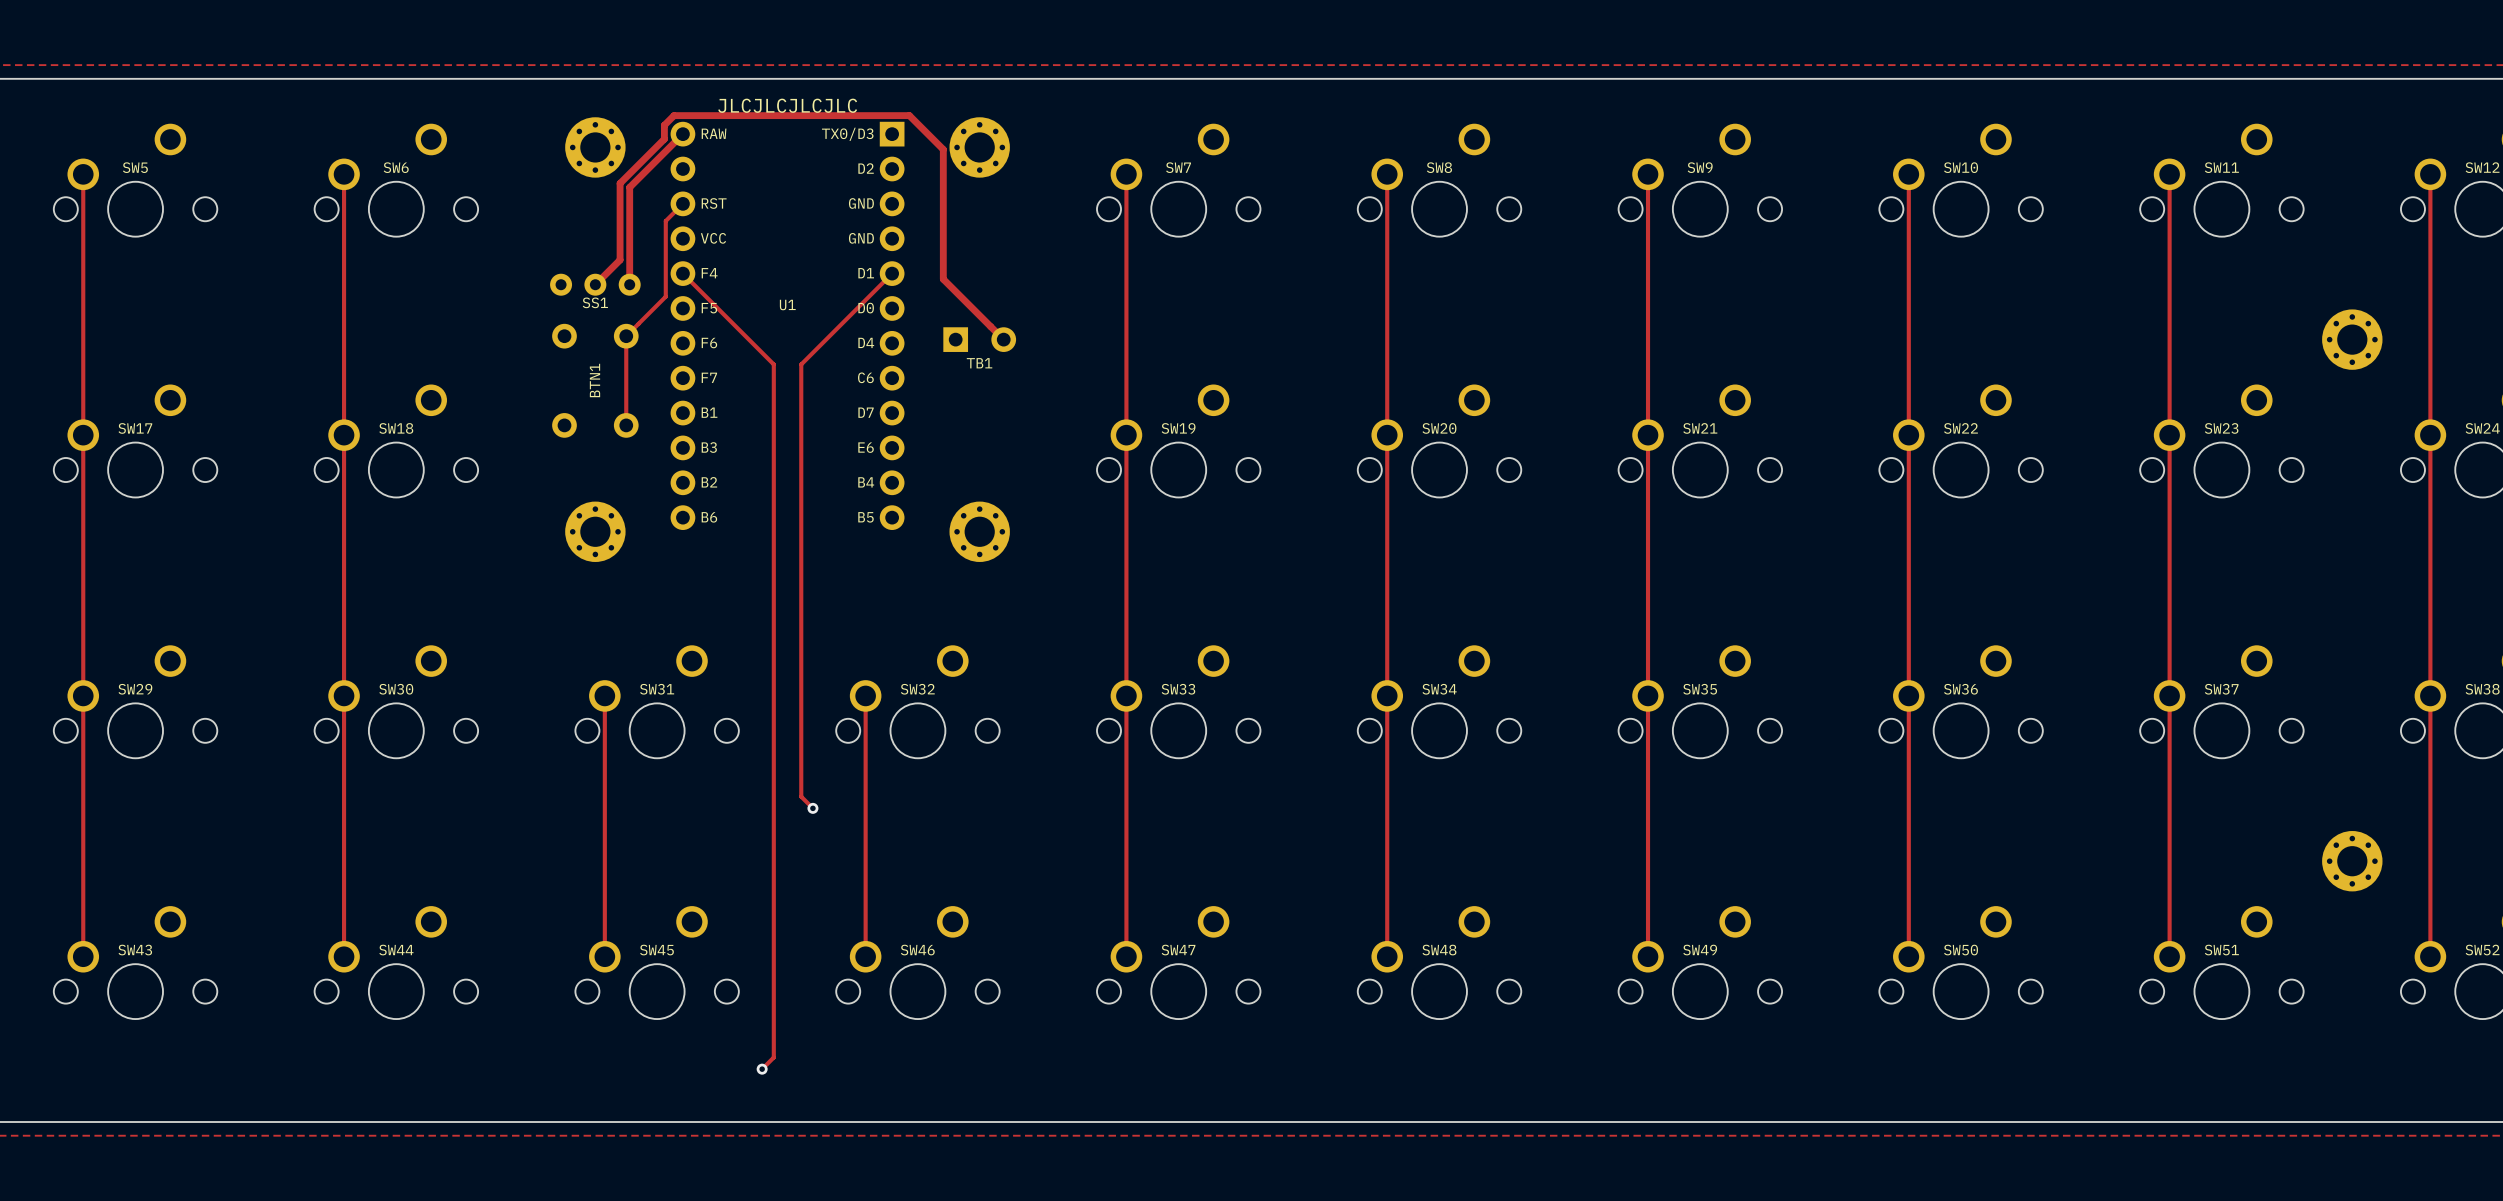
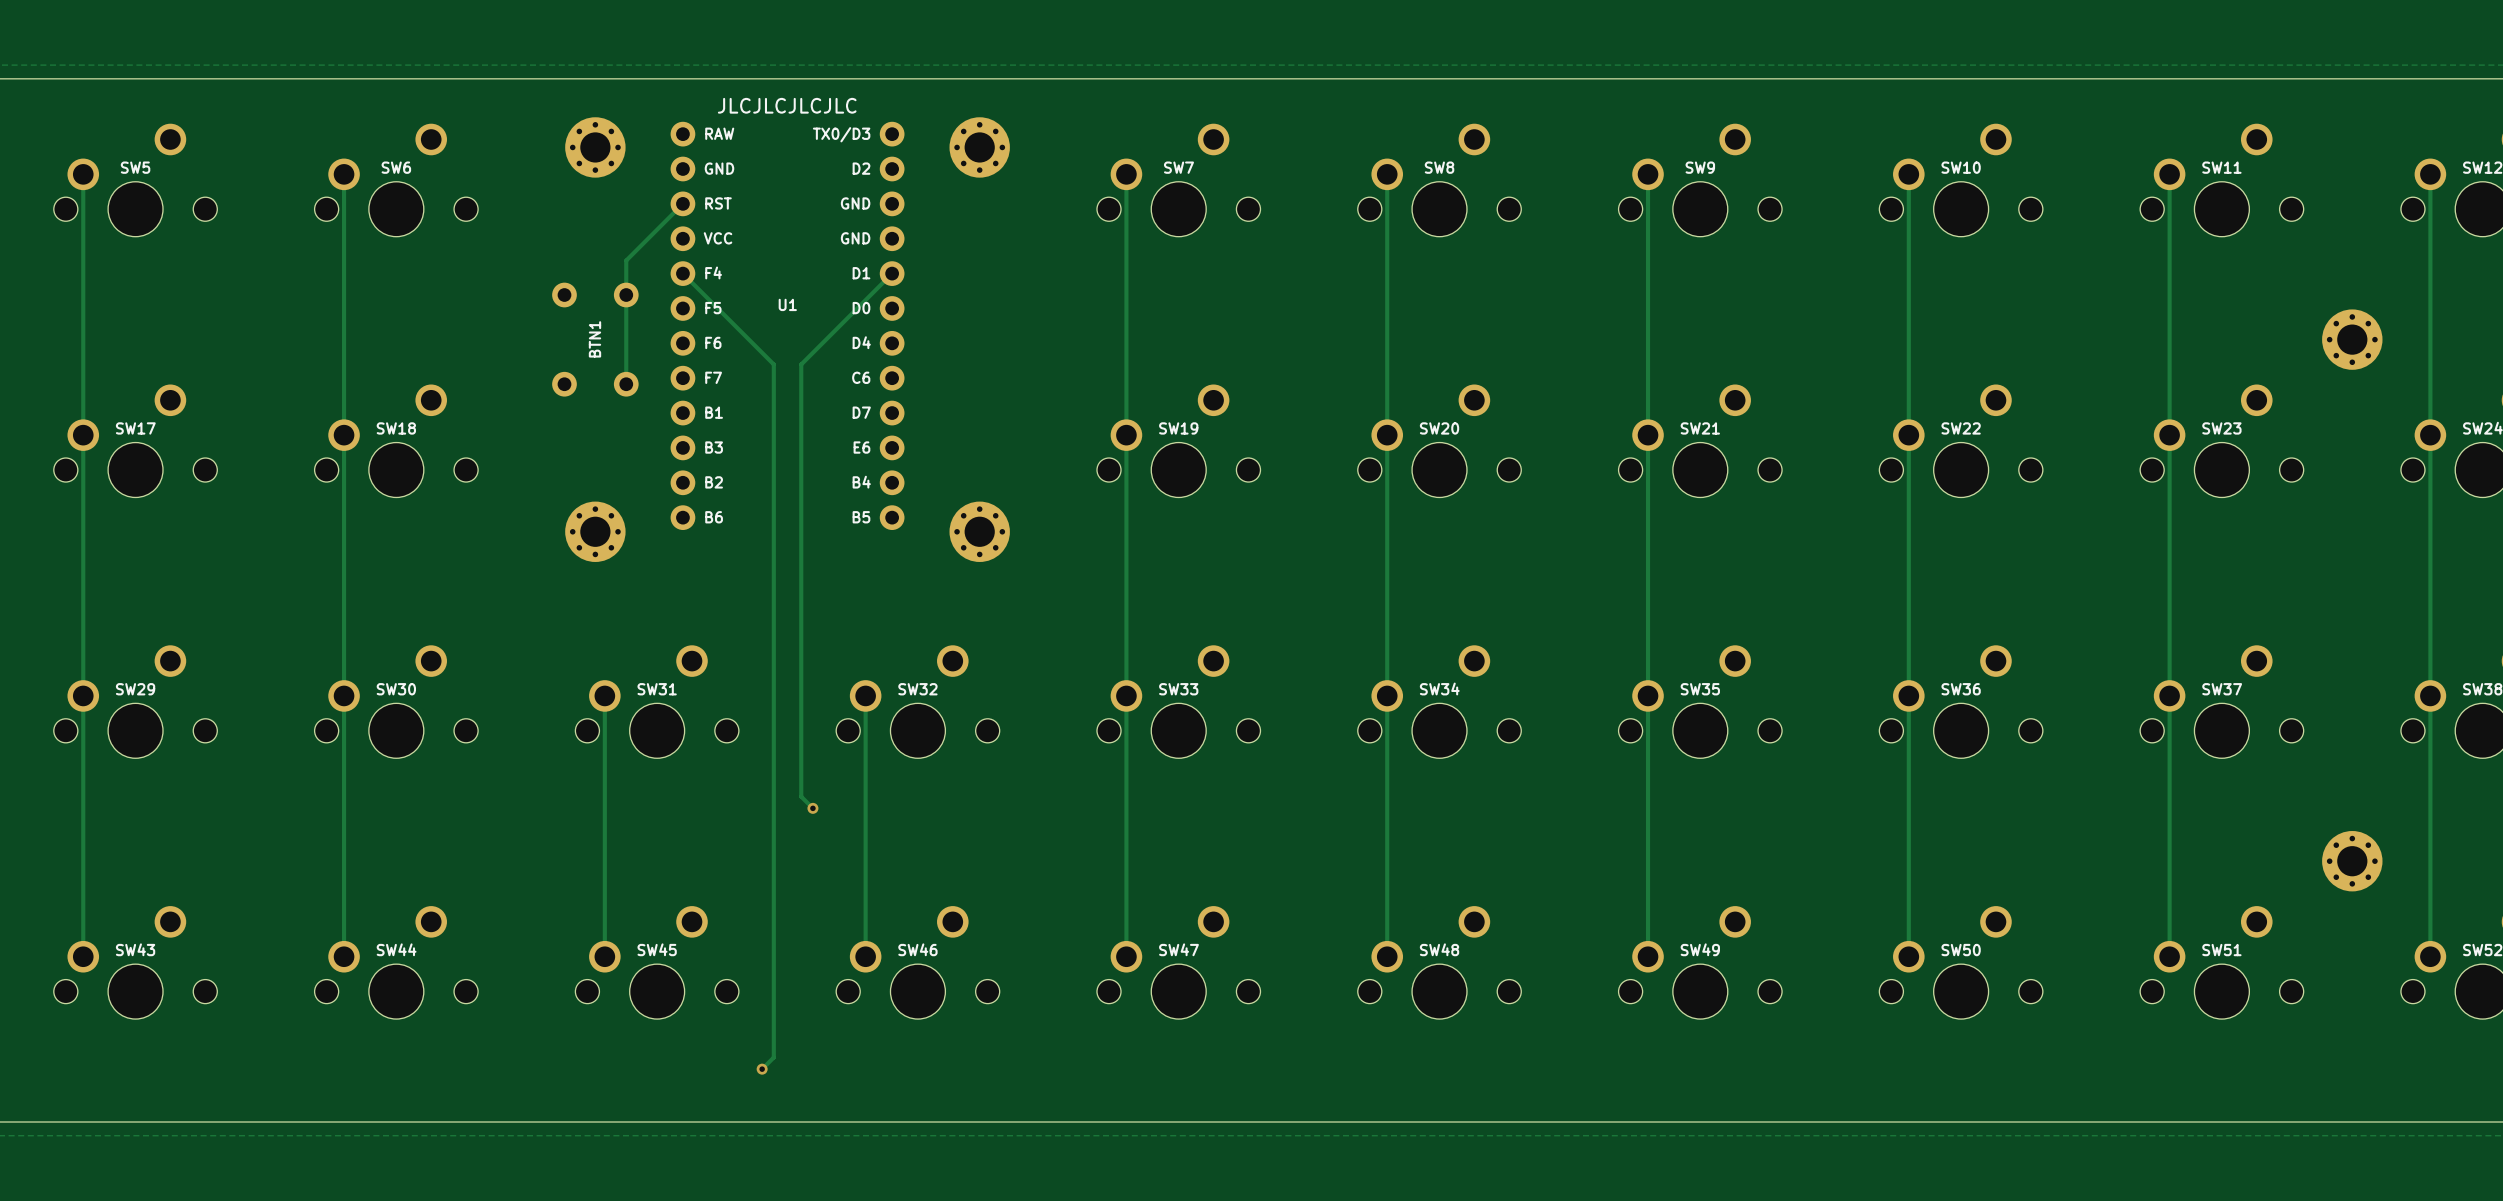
U1 footprint: [670, 121, 905, 531] -> [670, 121, 905, 531]
track: (682, 134) (629, 187) (629, 284) -> none
track: (665, 221) (665, 296) (626, 336) -> (665, 221) (626, 260) (626, 336)
track: (595, 284) (620, 260) (620, 183) (664, 139) (664, 125) (674, 115) (909, 115) (943, 149) (943, 279) (1003, 339) -> none
SS1: (595, 284) -> none
TB1: (979, 339) -> none
BTN1 position: (595, 380) -> (595, 339)
track: (626, 384) (626, 425) -> none

